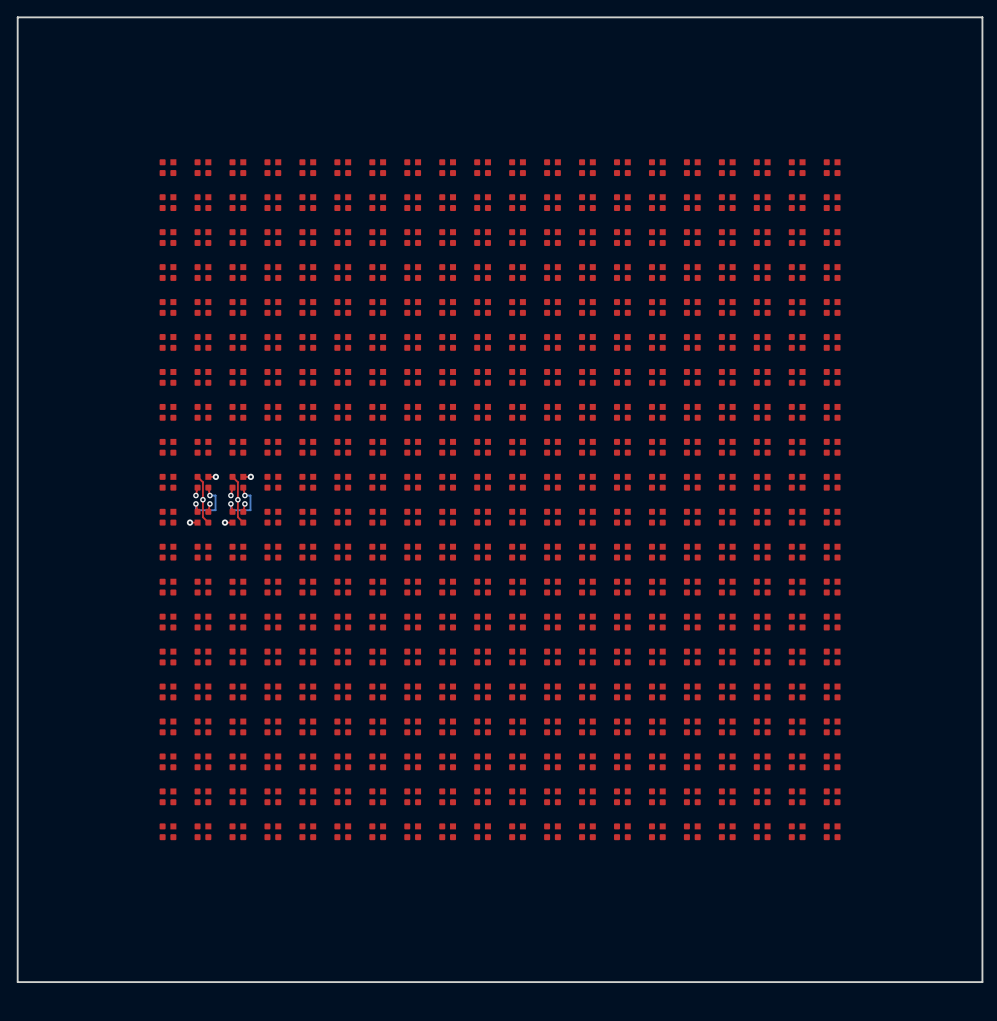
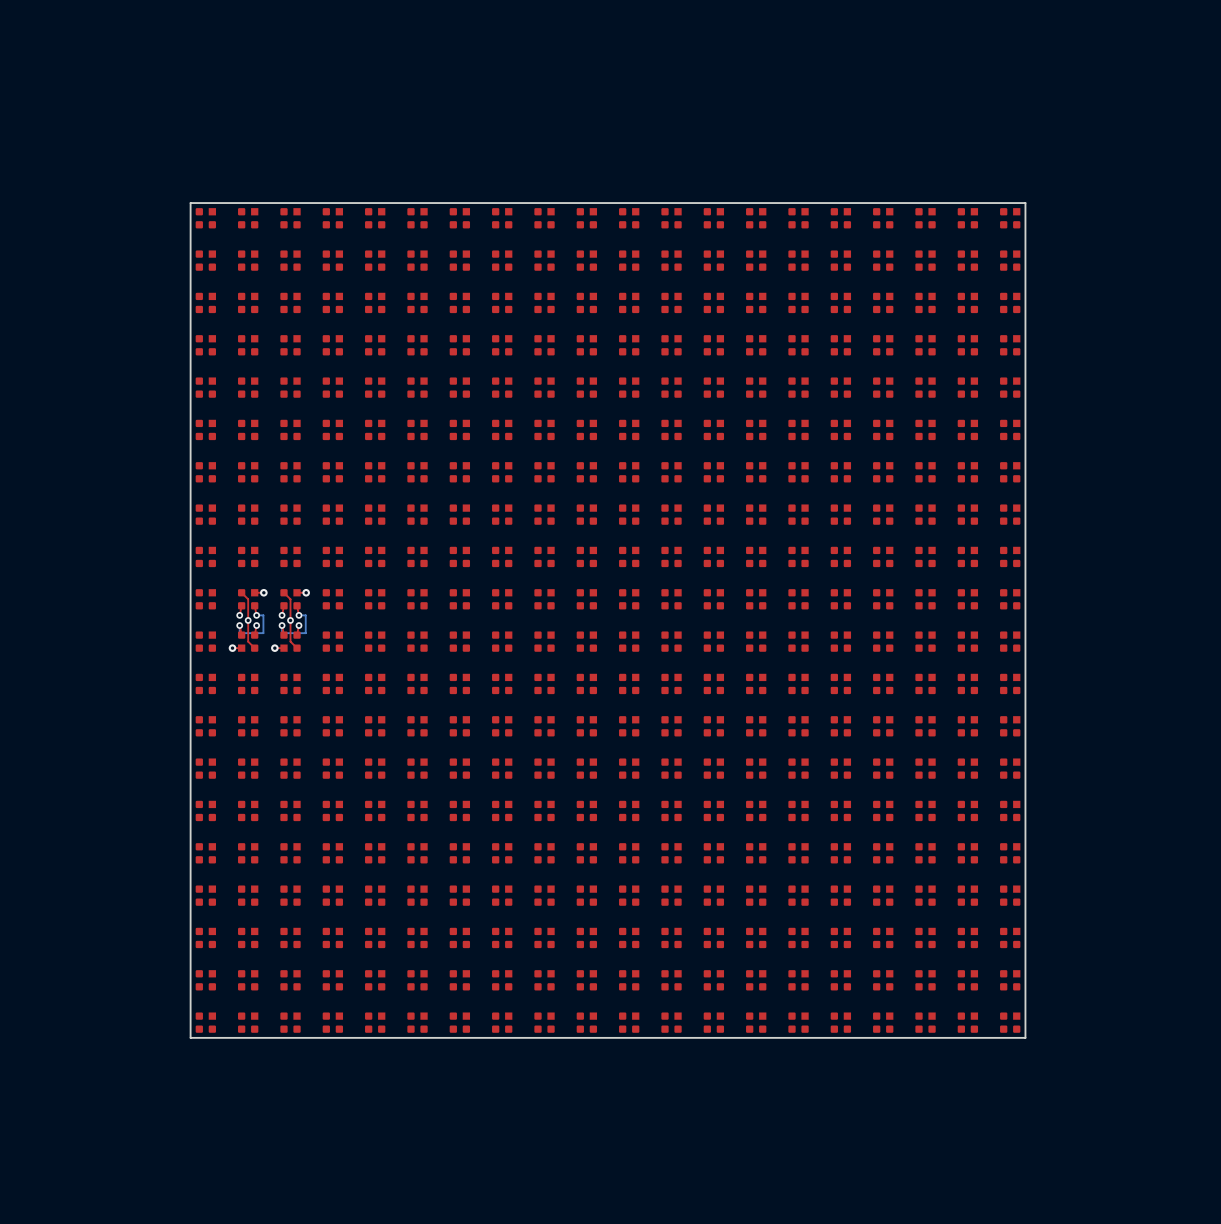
board edge: (17, 17) (982, 17) (982, 982) (17, 982) (17, 17) -> (190, 203) (190, 1037) (1025, 1037) (1025, 203) (190, 203)

